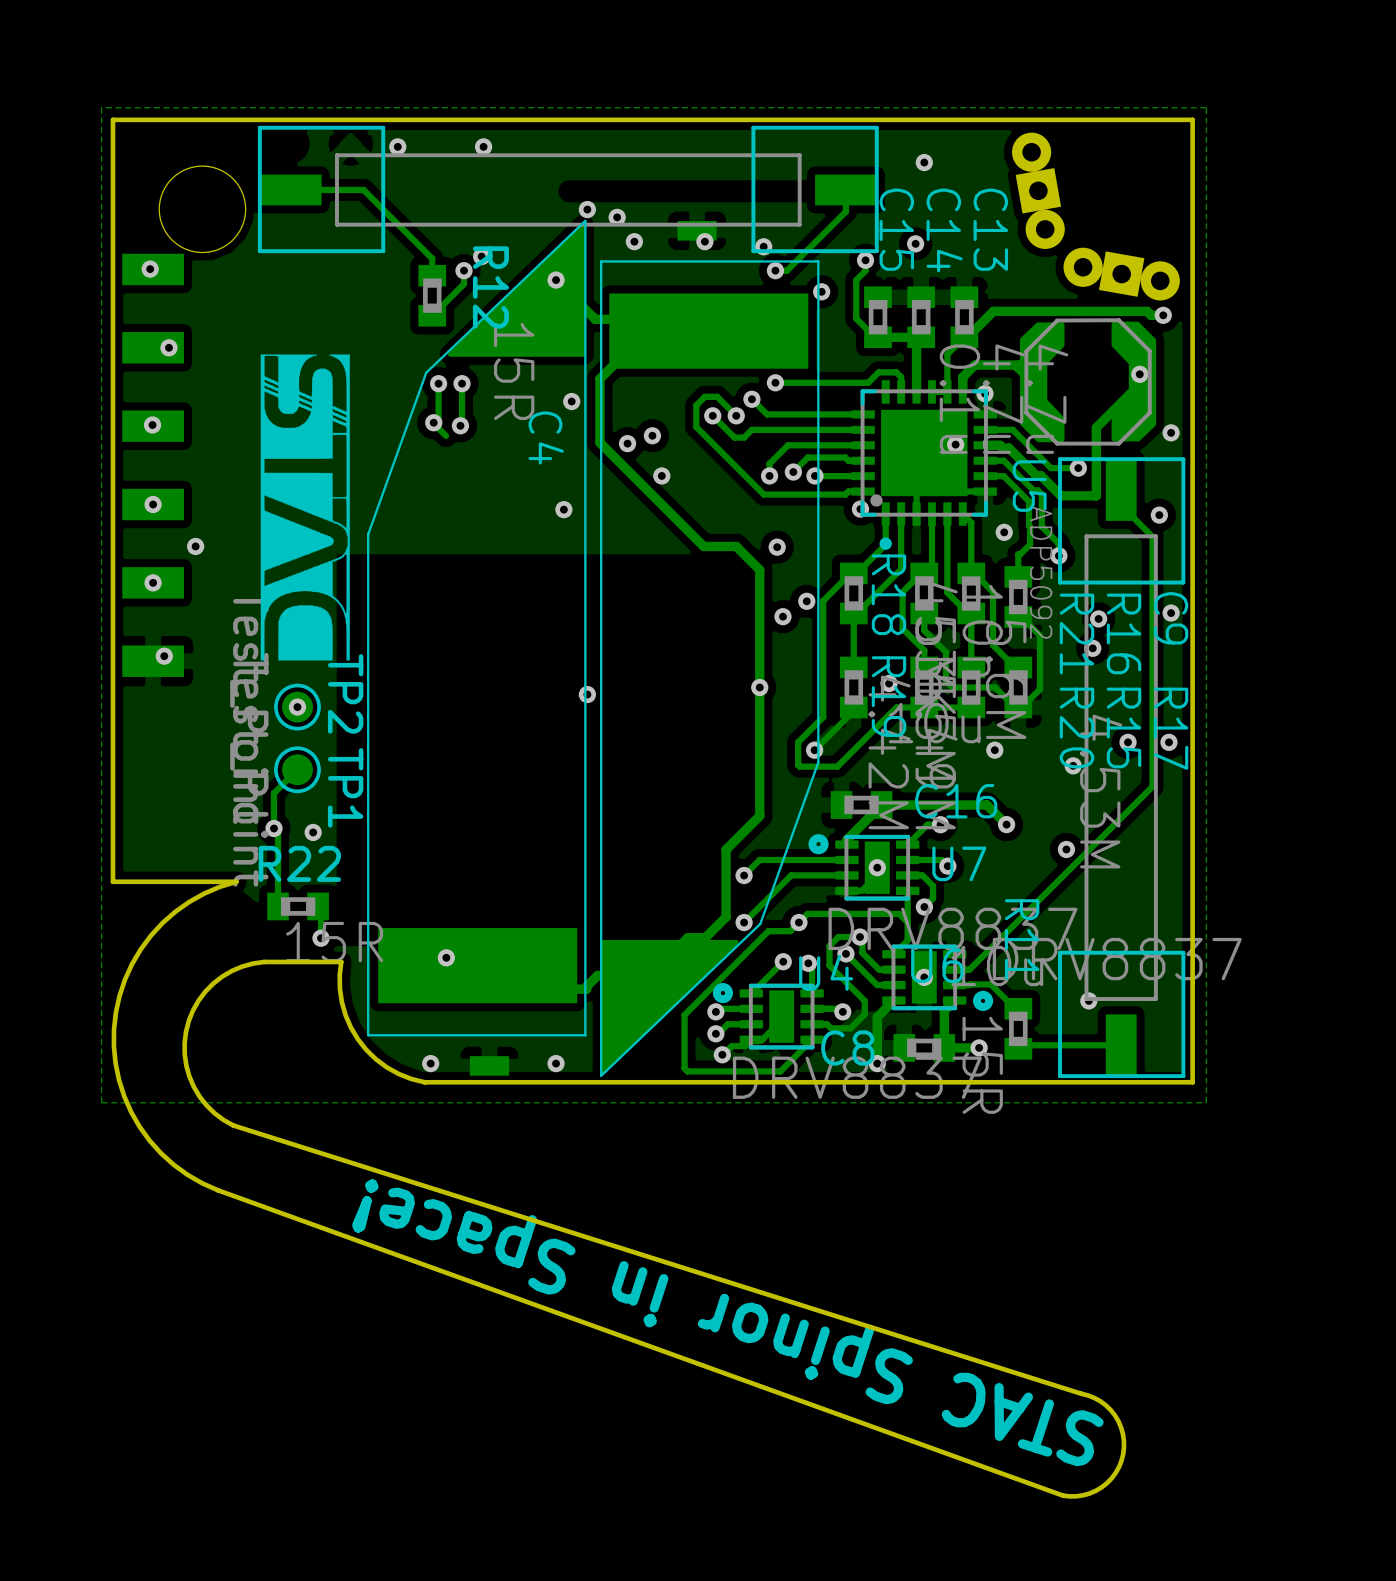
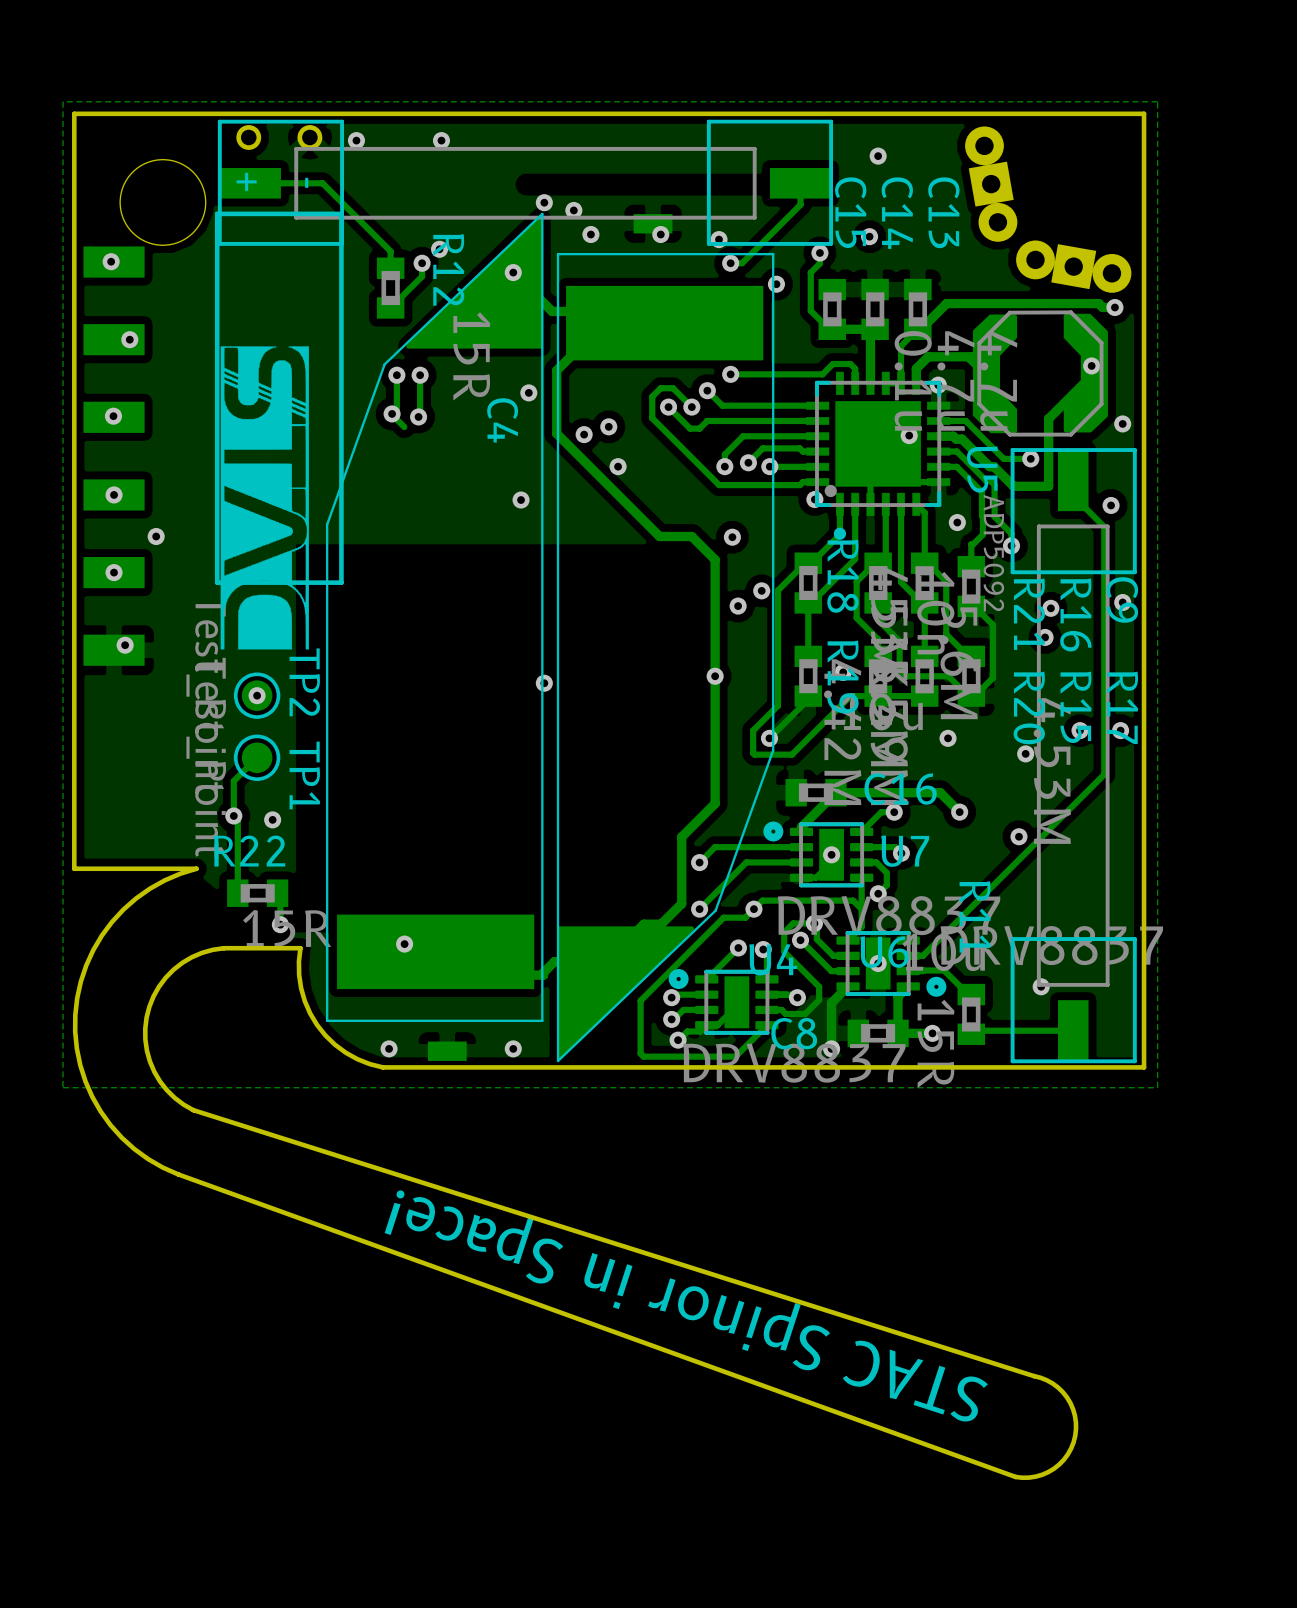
part: none -> (279, 355)

